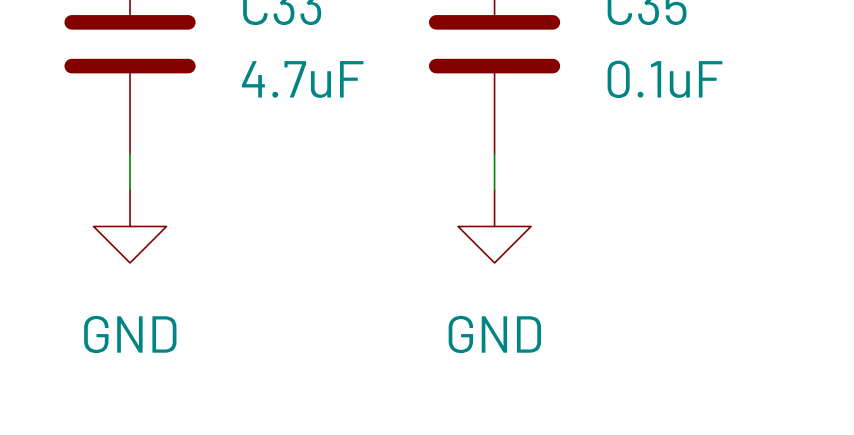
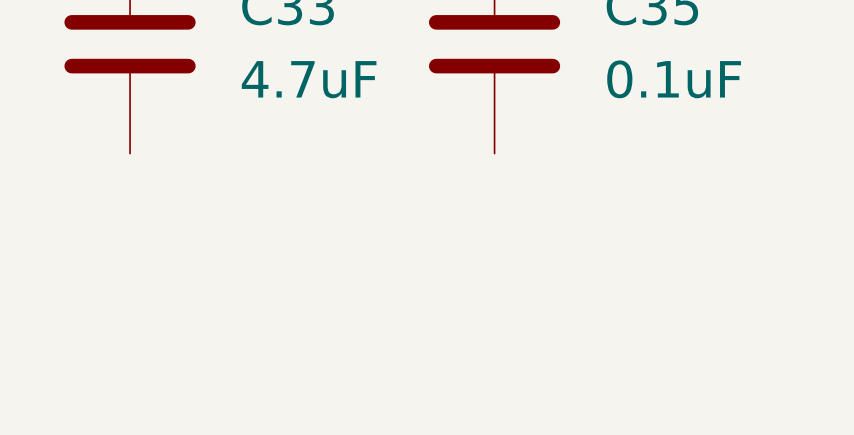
wire: (130, 153) (130, 190) -> none
wire: (494, 153) (494, 190) -> none
power symbol: GND (130, 226) -> none
power symbol: GND (494, 226) -> none

